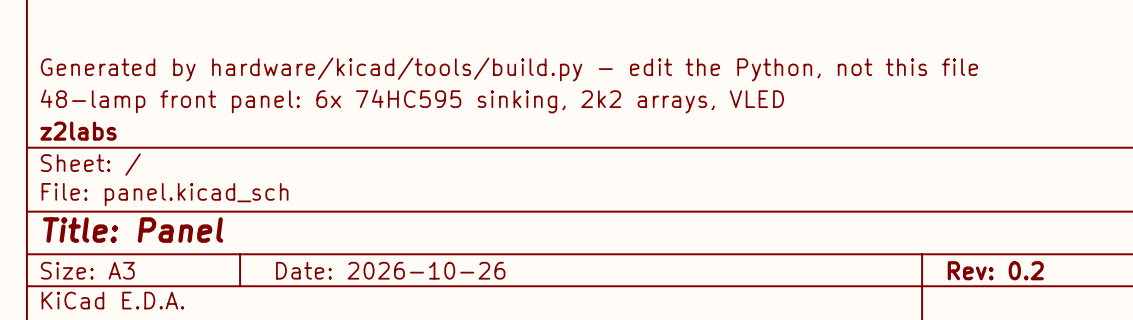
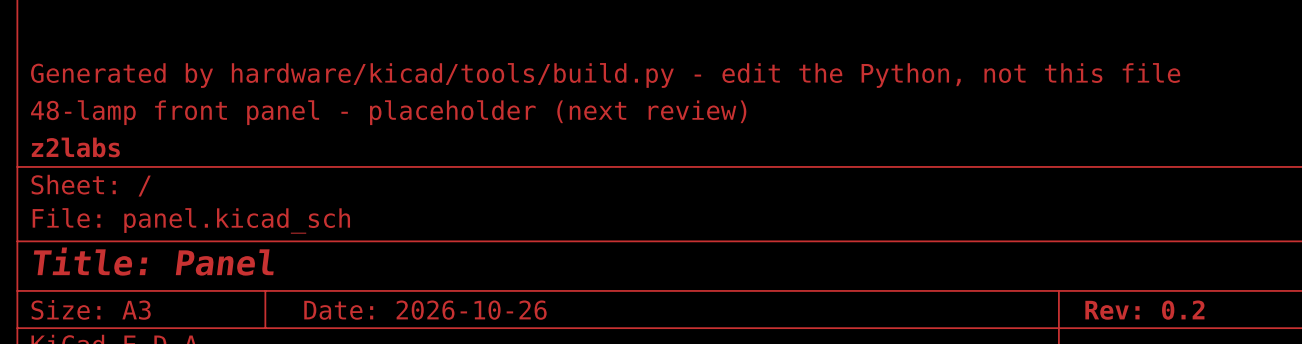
title block: 48-lamp front panel: 6x 74HC595 sinking, 2k2 arrays, VLED (412, 101) -> 48-lamp front panel - placeholder (next review) (388, 112)

